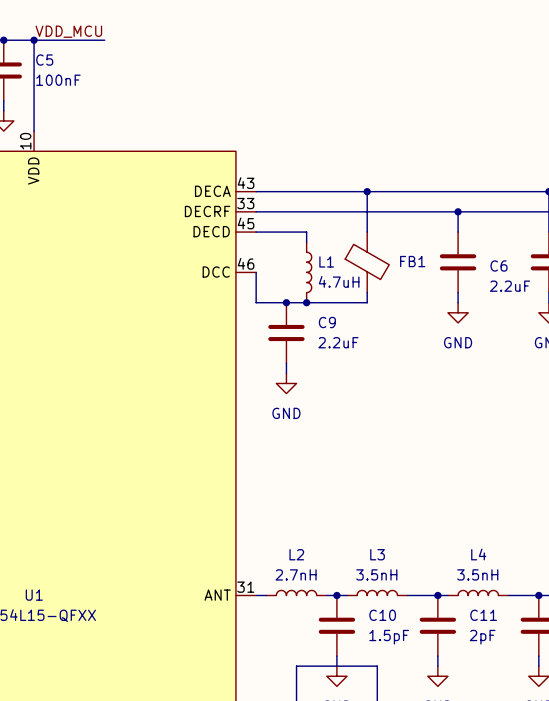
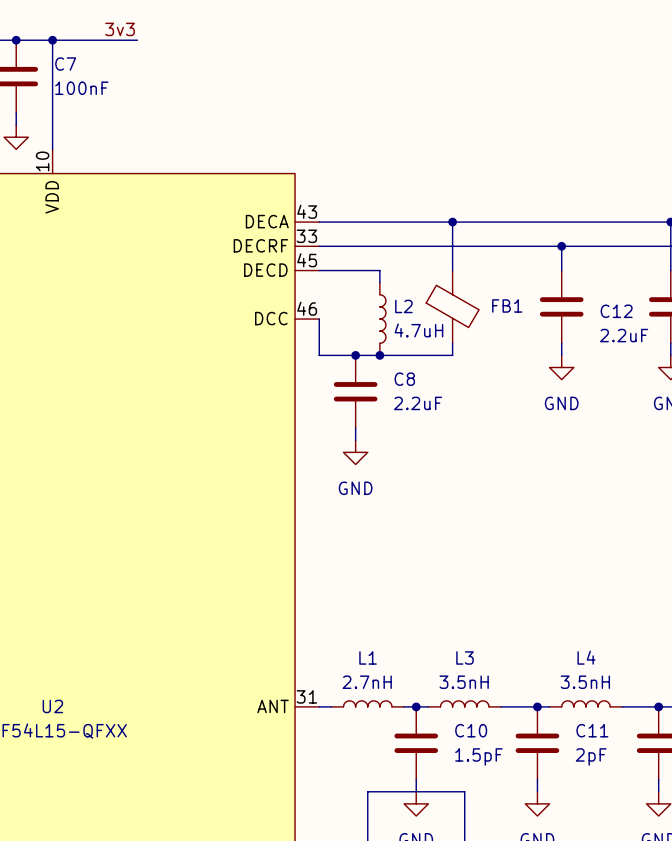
label: VDD_MCU (68, 31) -> 3v3 (120, 29)
C5 name: C5 (44, 60) -> C7 (65, 64)
L1 name: L1 (326, 261) -> L2 (403, 306)
C6 name: C6 (499, 265) -> C12 (616, 311)
C9 name: C9 (327, 322) -> C8 (404, 379)
L2 name: L2 (296, 554) -> L1 (368, 657)
U1 name: U1 (34, 595) -> U2 (52, 706)

